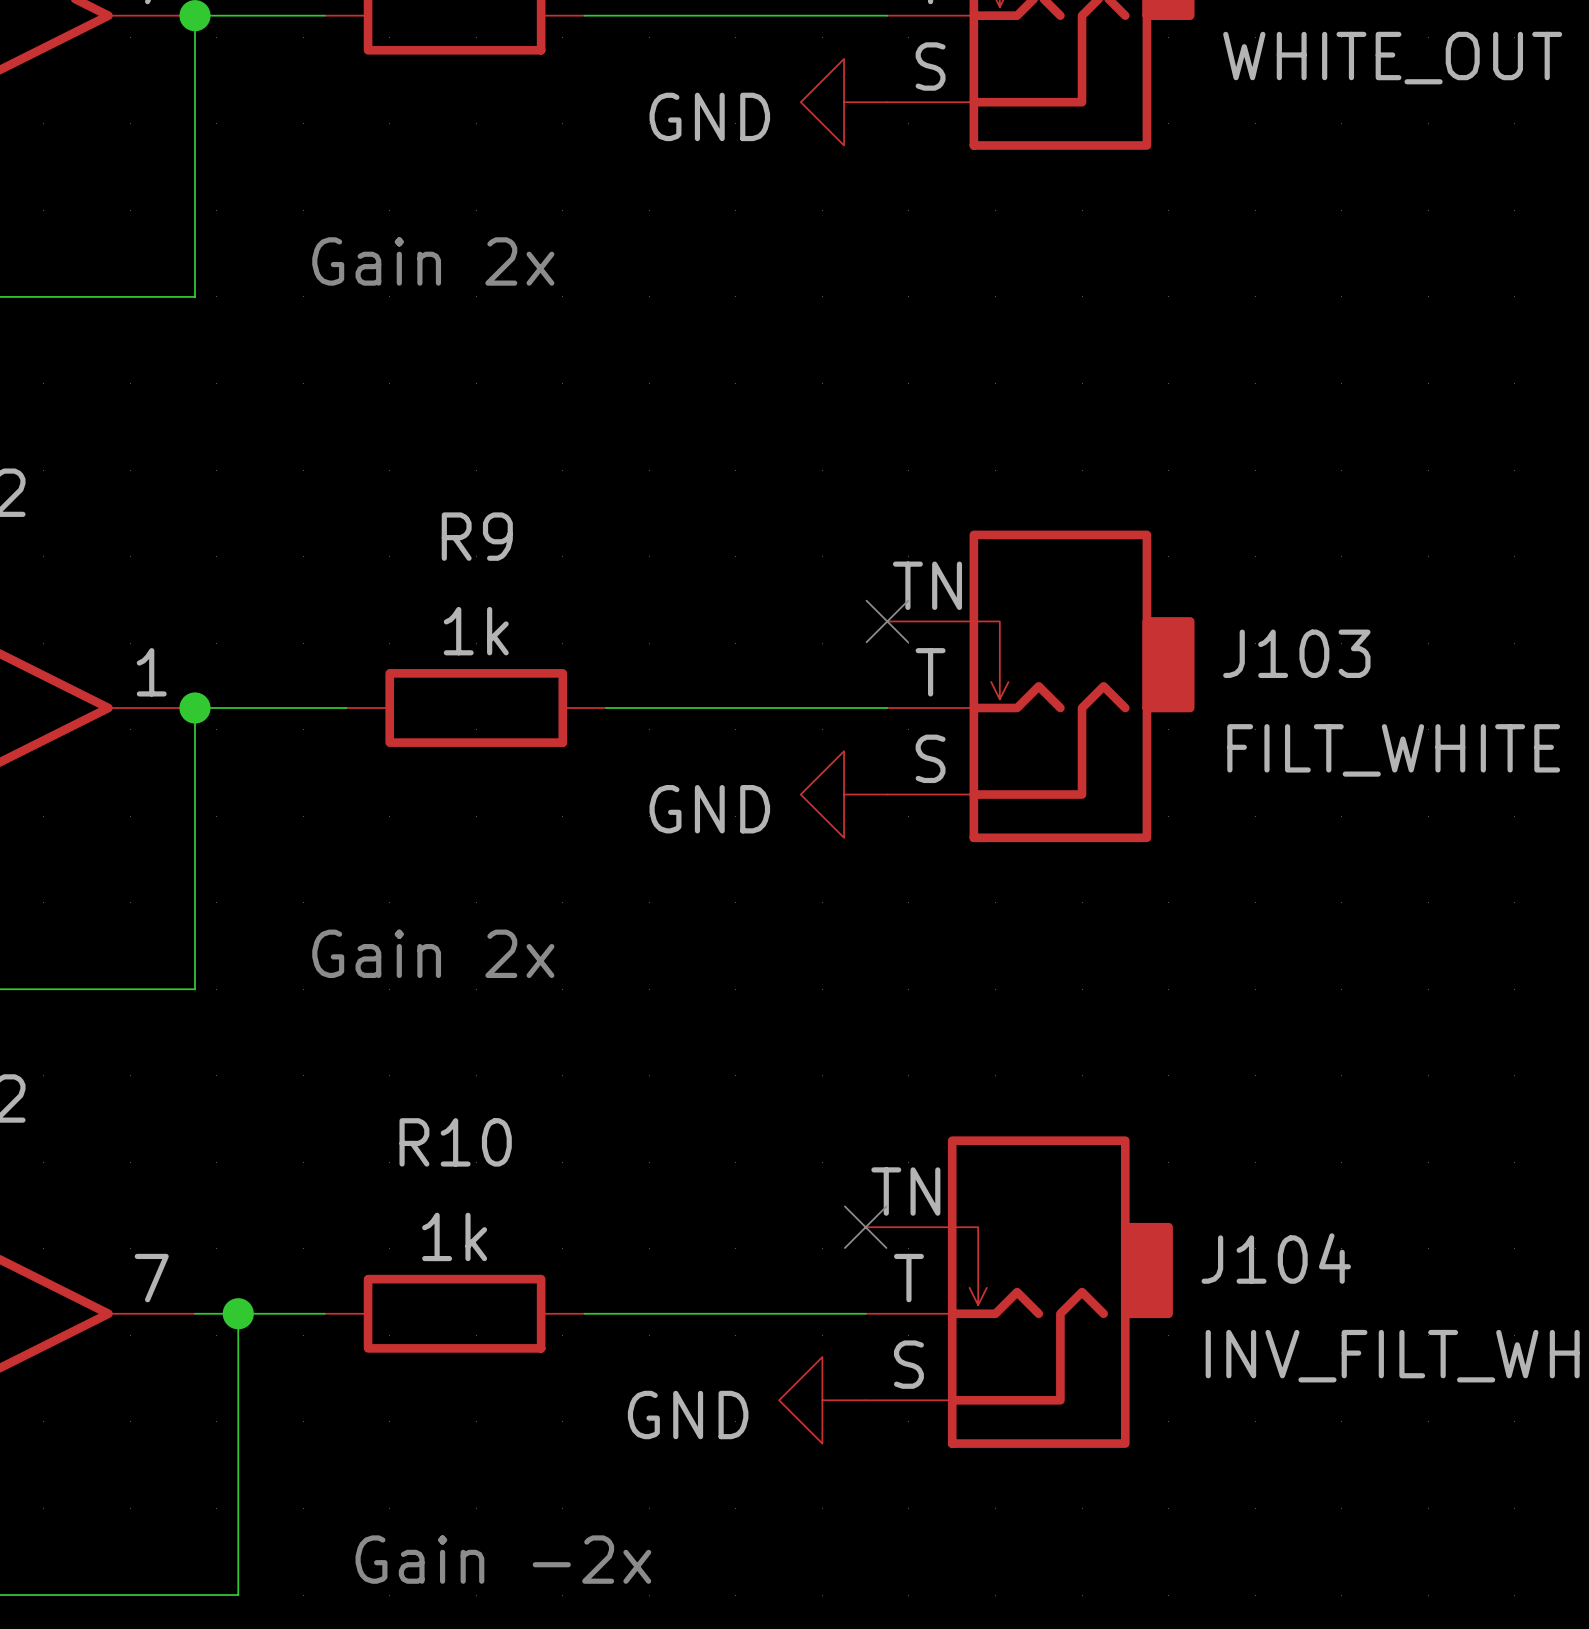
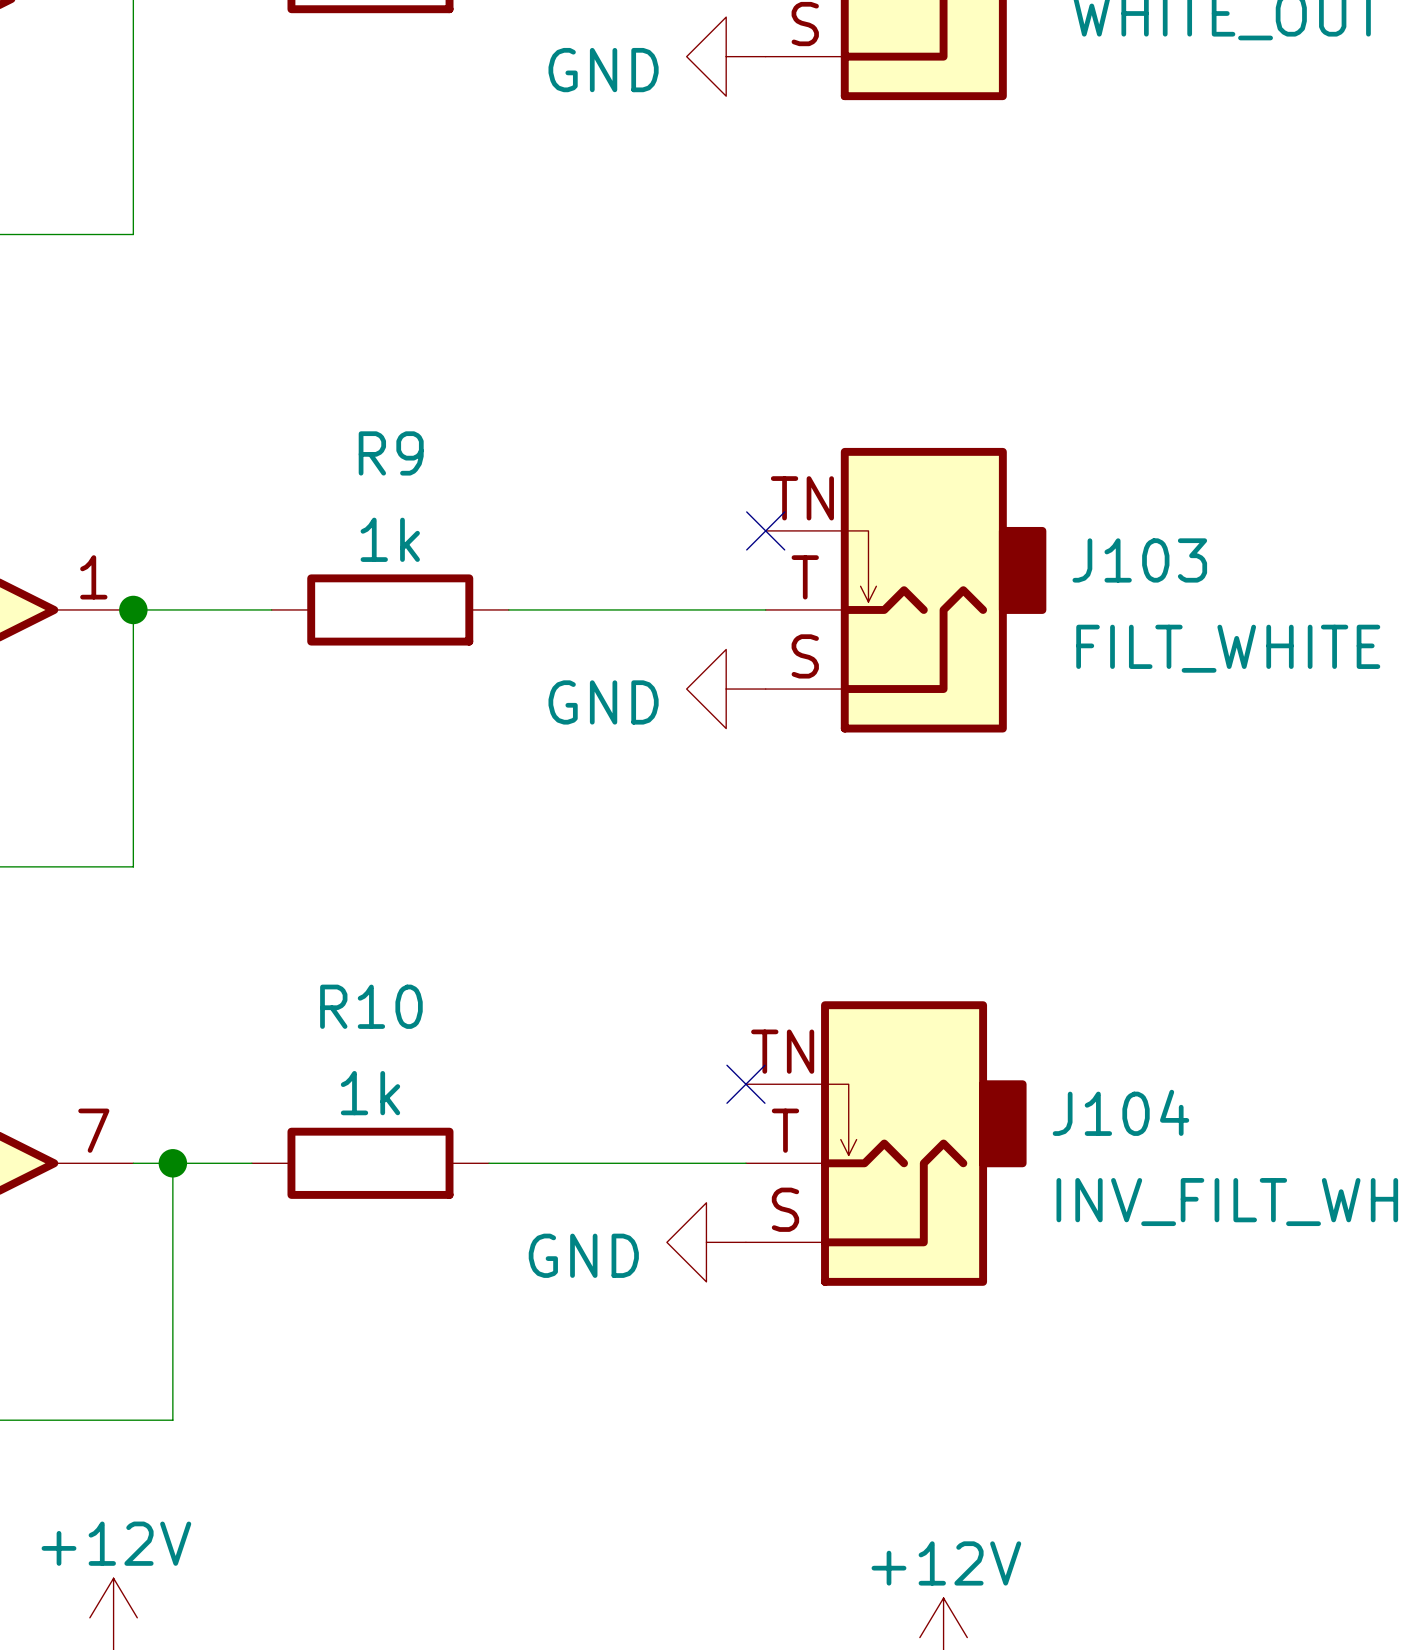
text: Gain 2x (433, 261) -> none
text: Gain 2x (433, 953) -> none
text: Gain -2x (503, 1559) -> none

